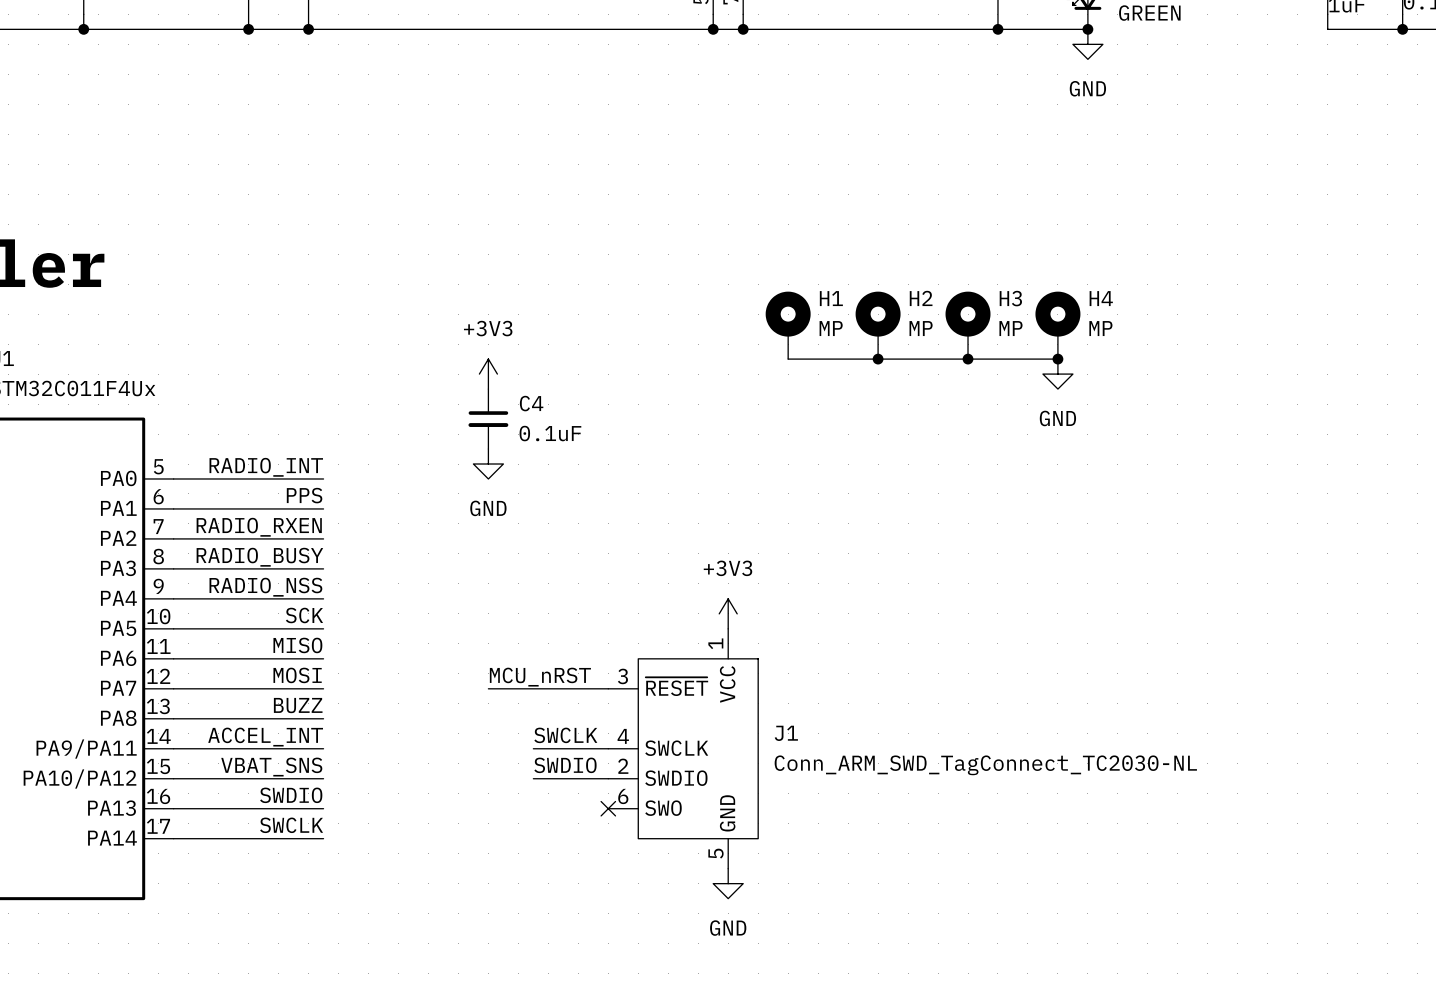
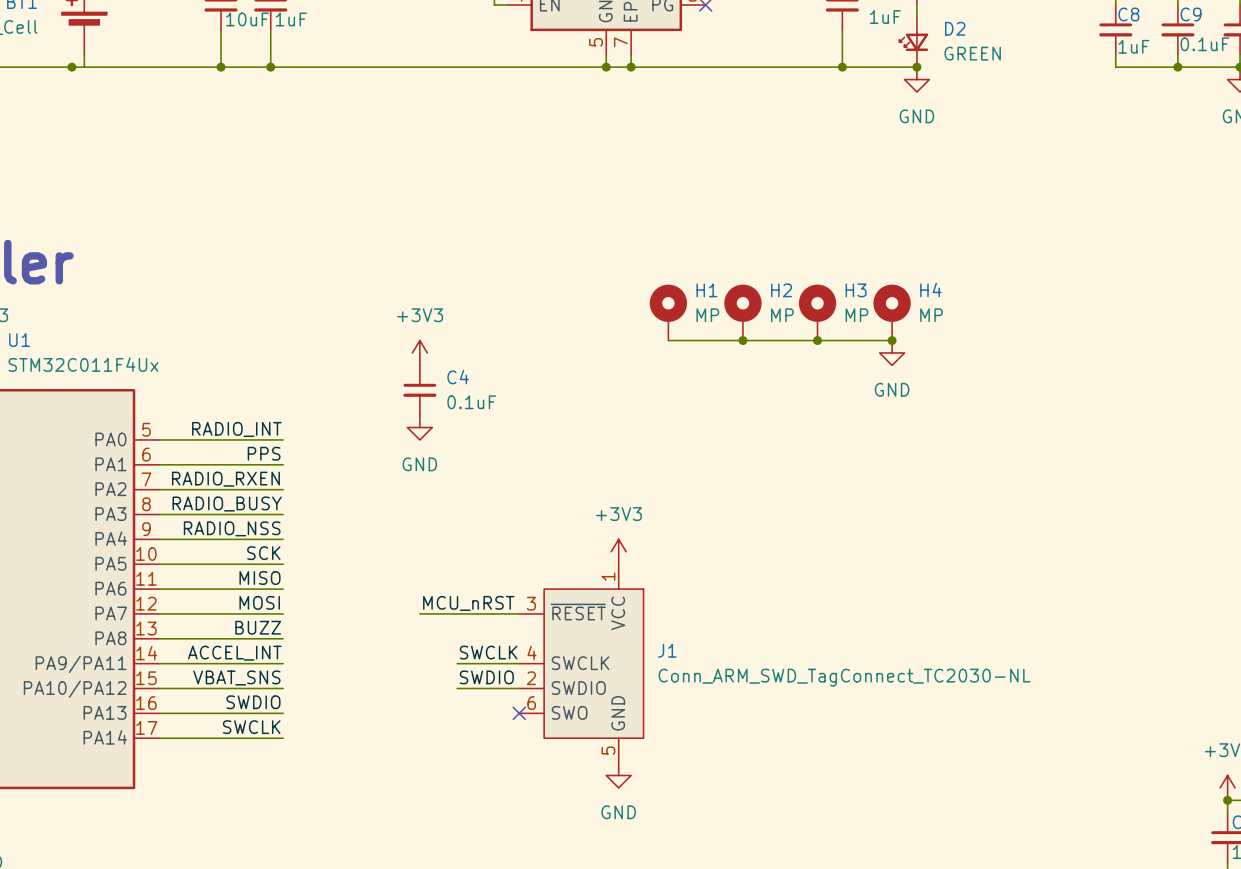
junction position: (83, 29) -> (71, 67)

